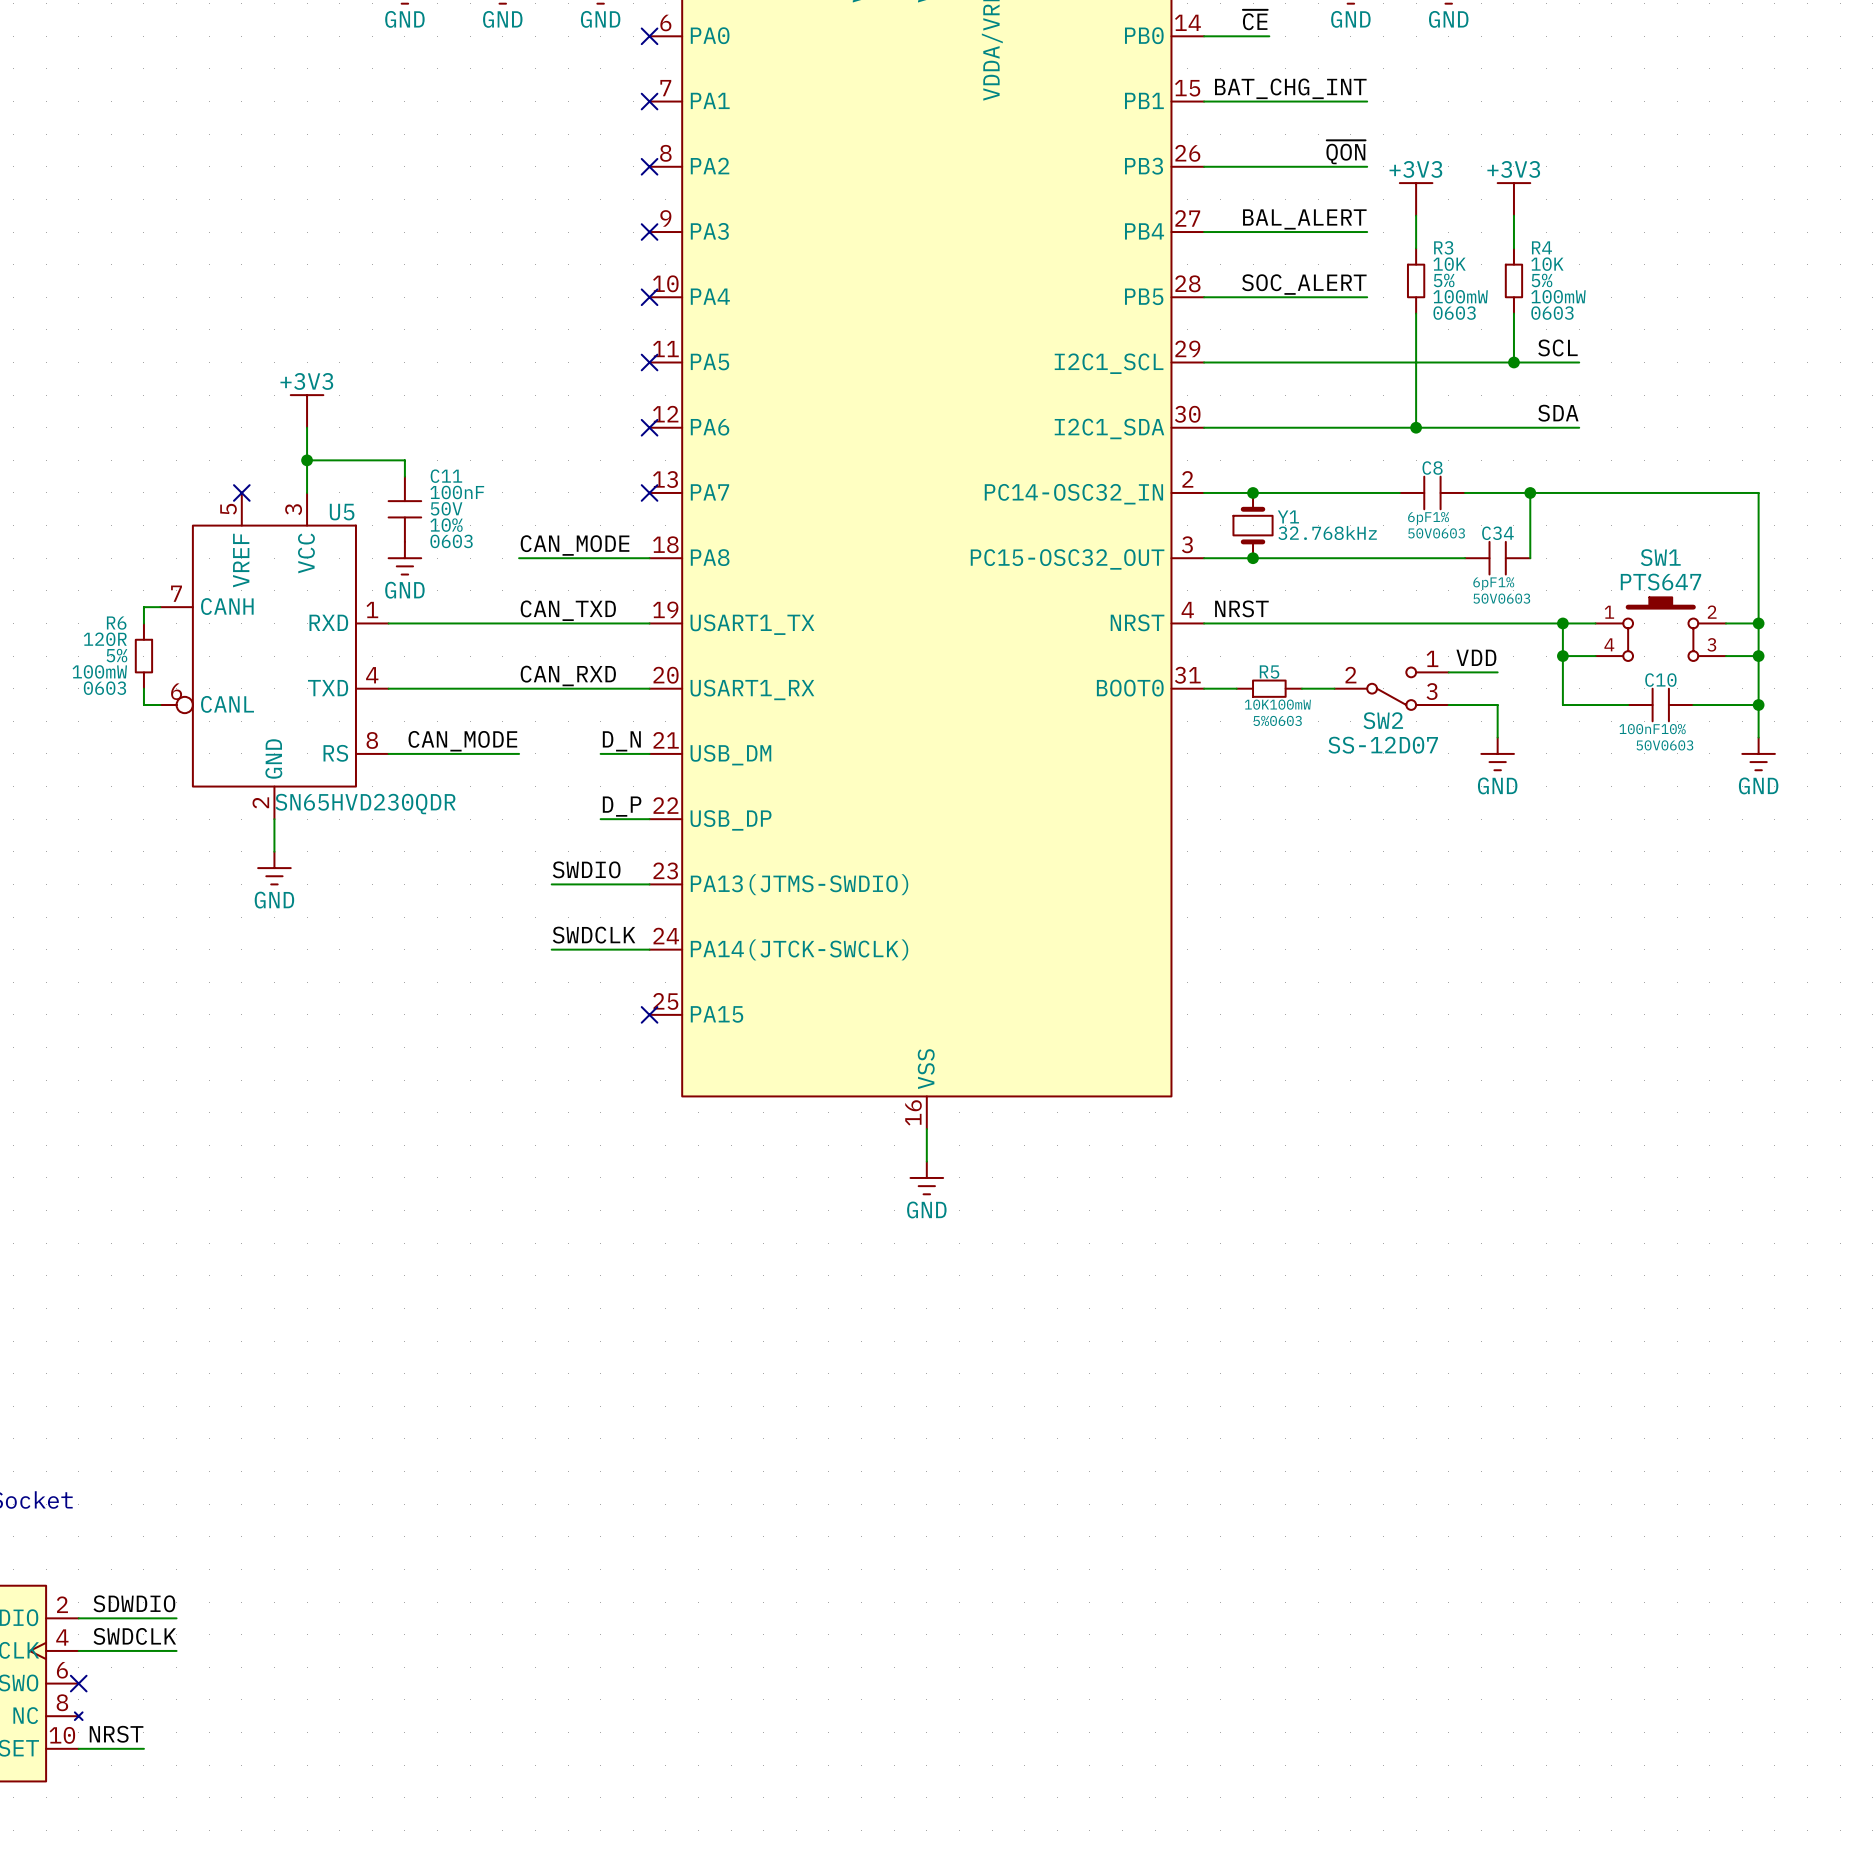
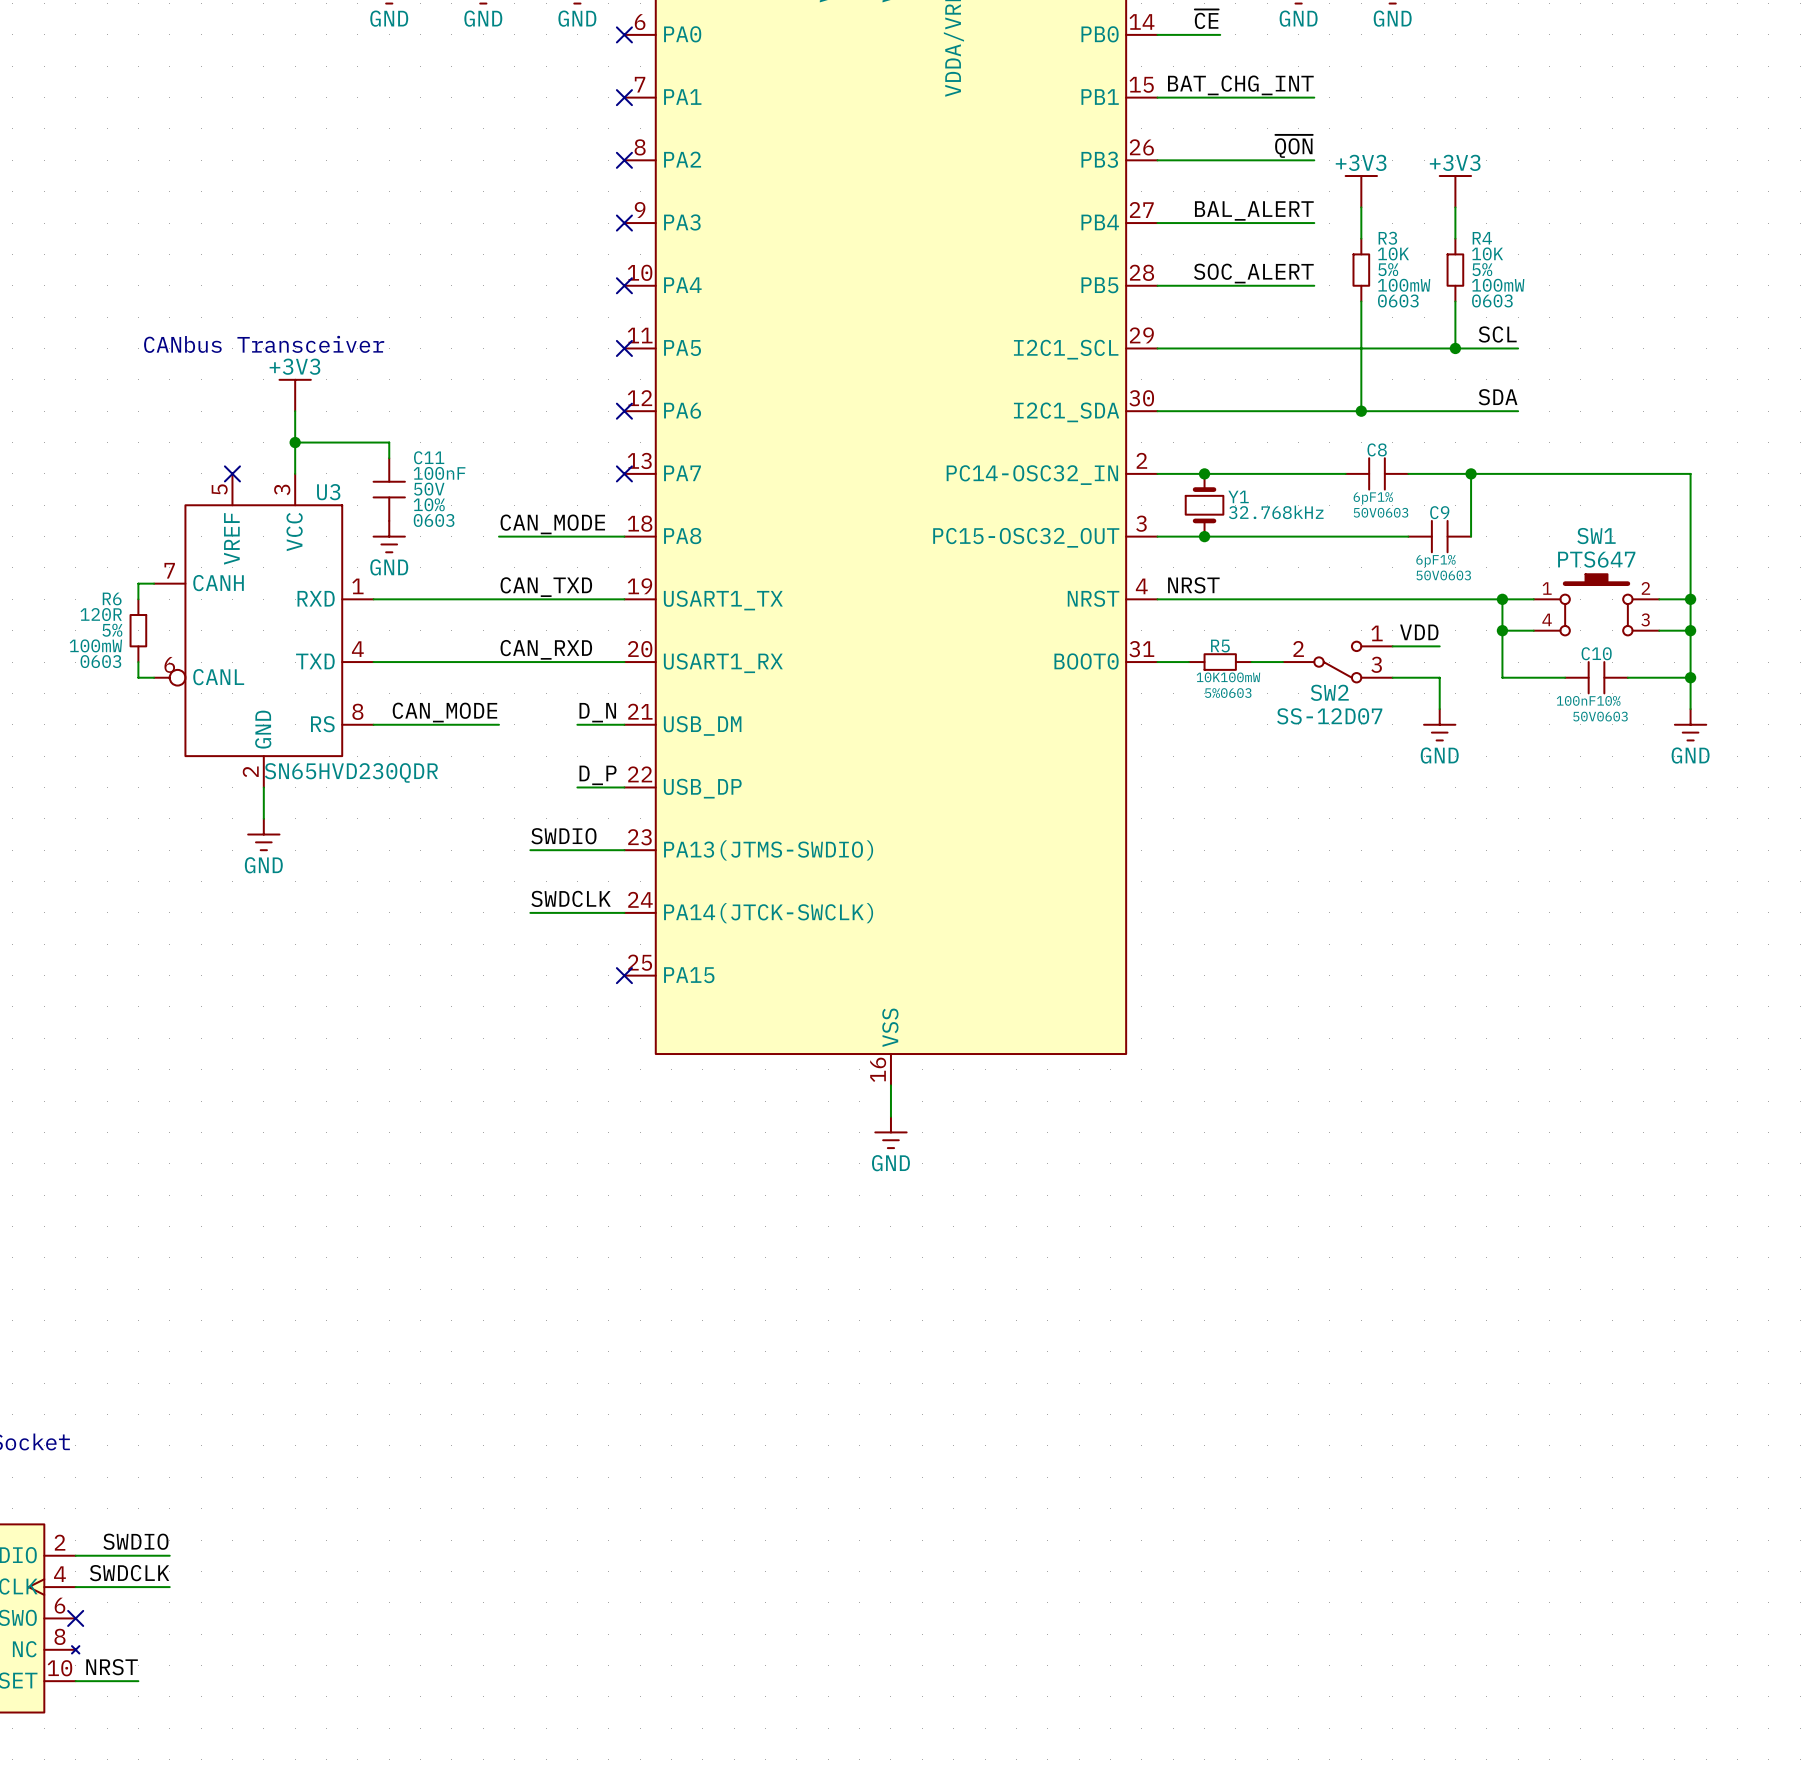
text: none -> CANbus Transceiver (264, 344)
U5 name: U5 (342, 512) -> U3 (328, 492)
C34 name: C34 (1497, 533) -> C9 (1439, 512)
label: SDWDIO (134, 1603) -> SWDIO (135, 1541)

